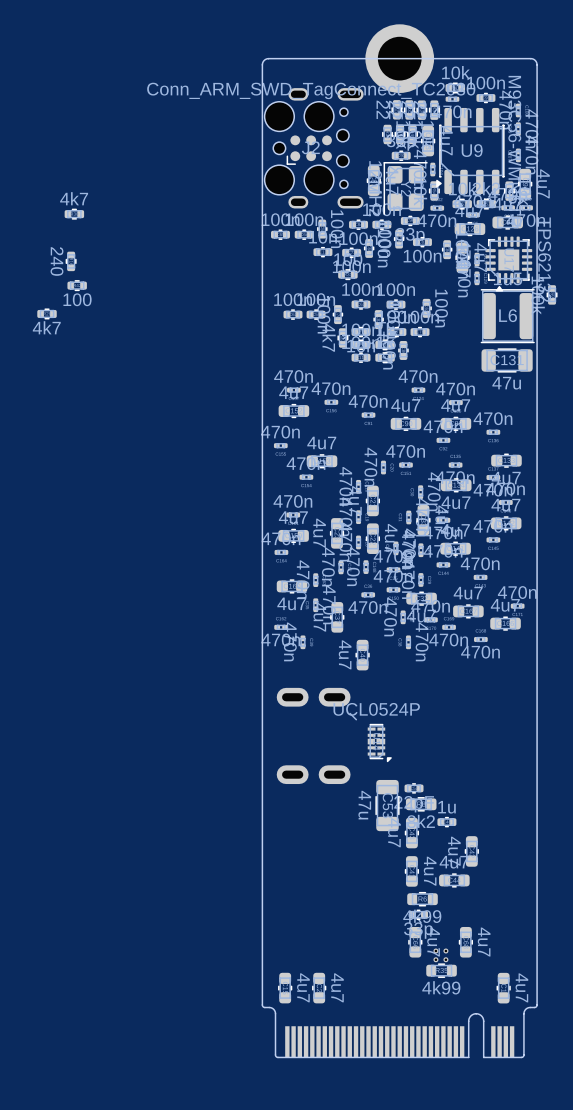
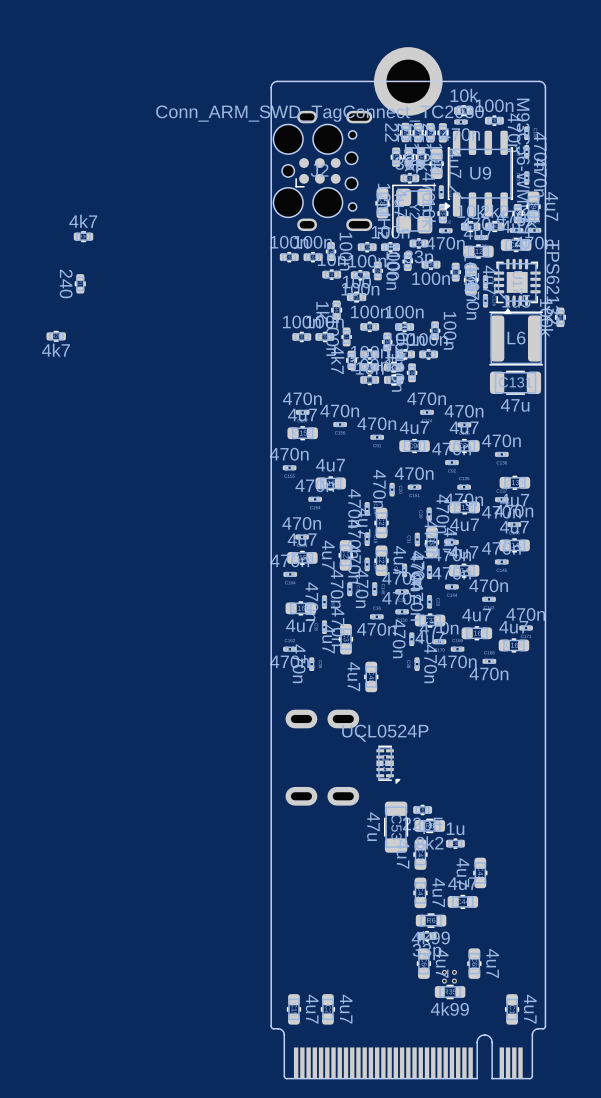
part rotation: 0° (77, 285) -> 90° clockwise (336, 310)
part position: (77, 285) -> (336, 310)
part value: 100 (77, 299) -> 1k (322, 310)

